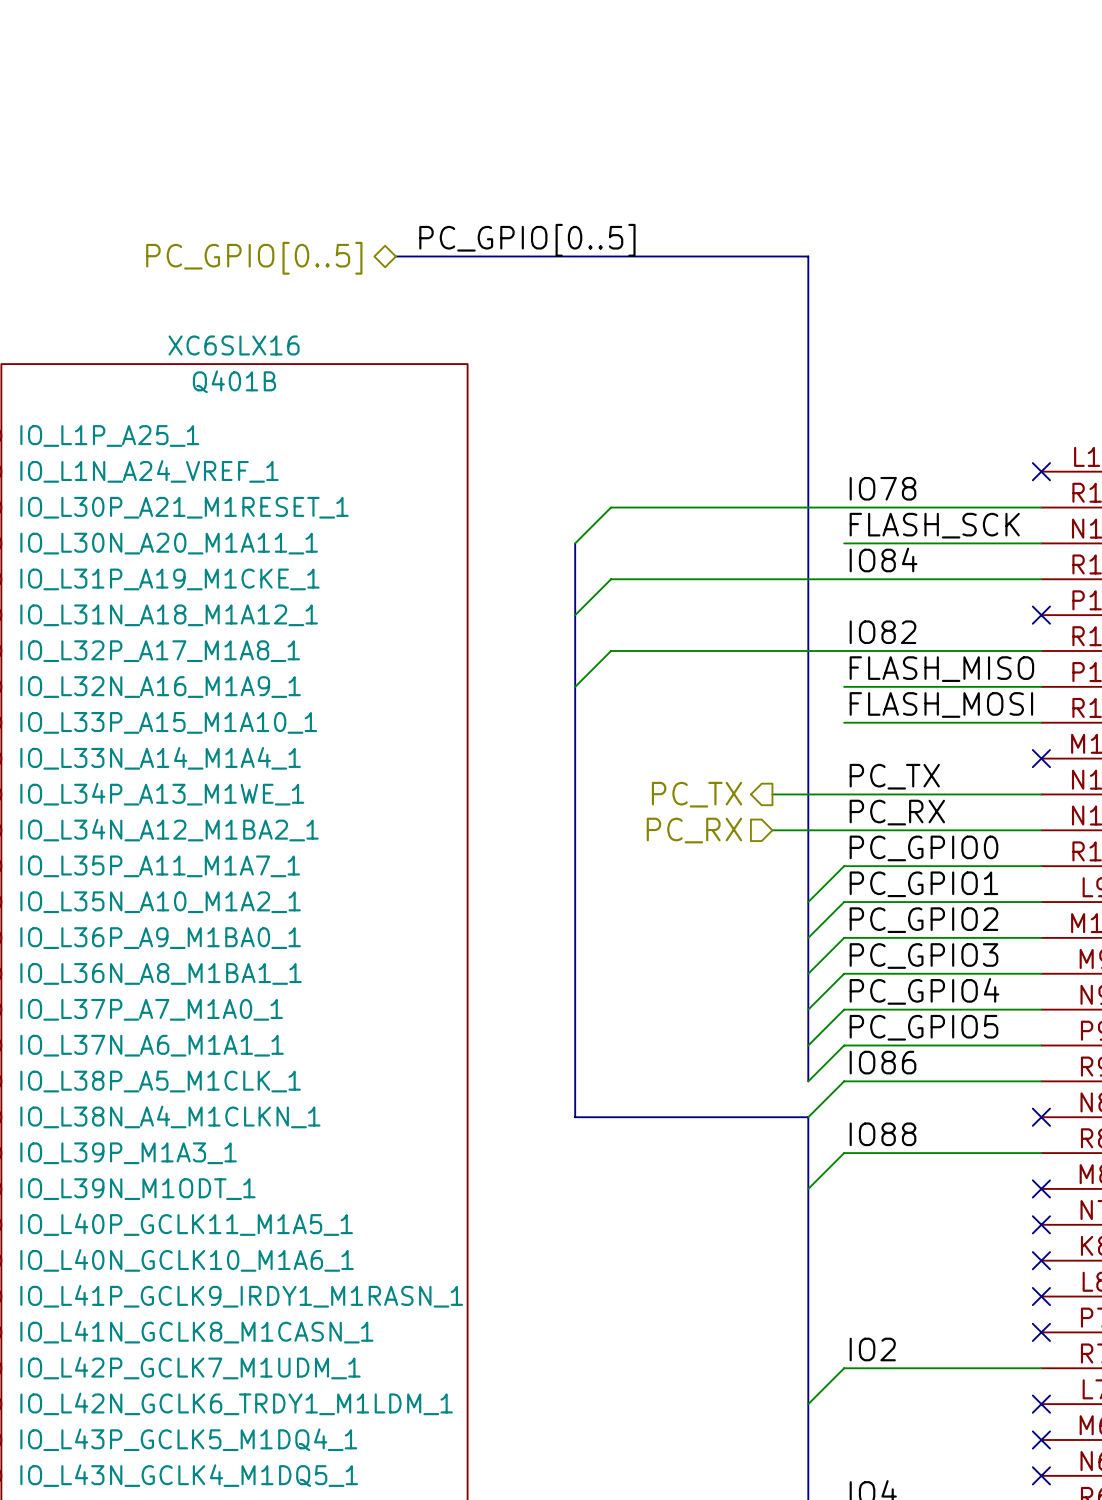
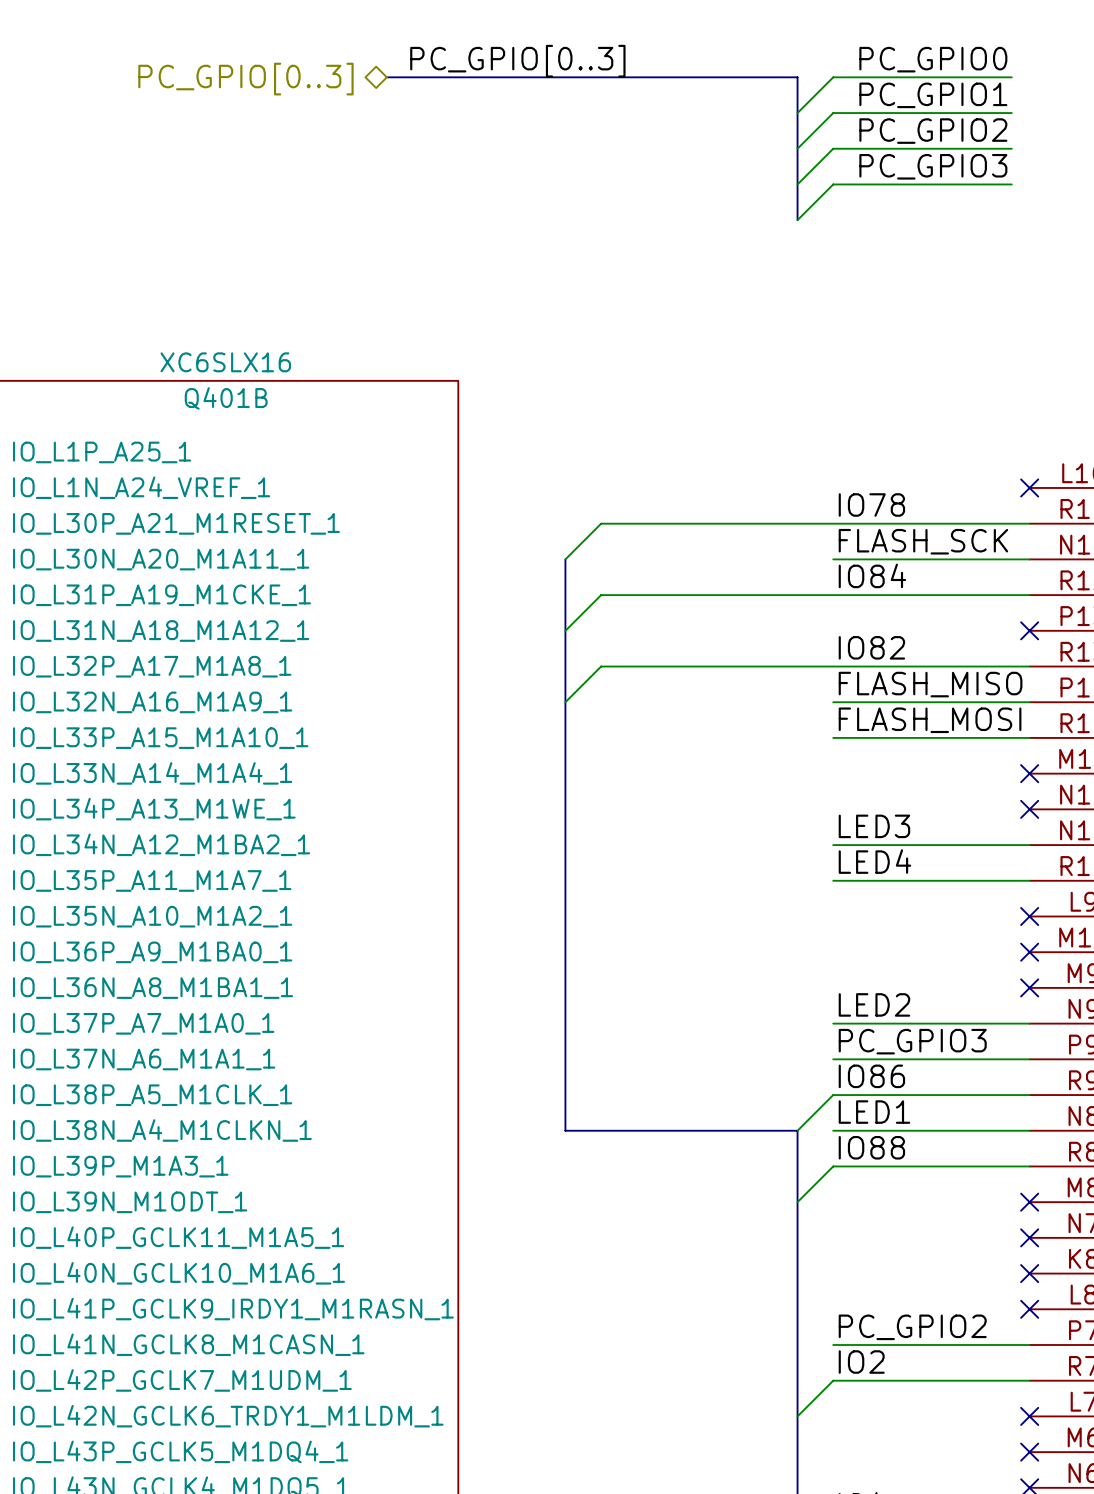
label: none -> PC_GPIO0 (933, 59)
label: none -> PC_GPIO[0..3] (517, 61)
bus: none -> (386, 77) (797, 77) (797, 220)
wire: none -> (1011, 77) (833, 77) (797, 113)
hierarchical label: none -> PC_GPIO[0..3] (245, 79)
label: none -> PC_GPIO1 (933, 95)
wire: none -> (1011, 113) (833, 113) (797, 148)
label: none -> PC_GPIO2 (933, 131)
wire: none -> (1011, 148) (833, 148) (797, 184)
label: none -> PC_GPIO3 (933, 166)
wire: none -> (1011, 184) (833, 184) (797, 220)
label: PC_GPIO[0..5] (527, 240) -> none
bus: (395, 256) (808, 256) (808, 1081) -> none
hierarchical label: PC_GPIO[0..5] (254, 258) -> none
label: PC_TX (894, 776) -> none
hierarchical label: PC_TX (696, 794) -> none
wire: (772, 794) (1041, 794) -> none
no-connect mark: none -> (1029, 809)
label: PC_RX (897, 812) -> LED3 (874, 826)
hierarchical label: PC_RX (694, 830) -> none
wire: (772, 830) (844, 830) -> none
label: PC_GPIO0 (923, 848) -> LED4 (874, 861)
wire: (844, 866) (808, 902) -> none
label: PC_GPIO1 (923, 884) -> none
wire: (1041, 902) (844, 902) (808, 937) -> none
no-connect mark: none -> (1029, 916)
label: PC_GPIO2 (923, 920) -> none
wire: (1041, 937) (844, 937) (808, 973) -> none
no-connect mark: none -> (1029, 952)
label: PC_GPIO3 (923, 956) -> none
wire: (1041, 973) (844, 973) (808, 1009) -> none
no-connect mark: none -> (1029, 987)
label: PC_GPIO4 (924, 991) -> LED2 (874, 1004)
wire: (844, 1009) (808, 1045) -> none
label: PC_GPIO5 (923, 1027) -> PC_GPIO3 (912, 1041)
wire: (844, 1045) (808, 1081) -> none
label: none -> LED1 (874, 1112)
wire: none -> (833, 1130) (1029, 1130)
no-connect mark: (1041, 1117) -> none
label: none -> PC_GPIO2 (912, 1327)
wire: none -> (833, 1345) (1029, 1345)
no-connect mark: (1041, 1332) -> none

